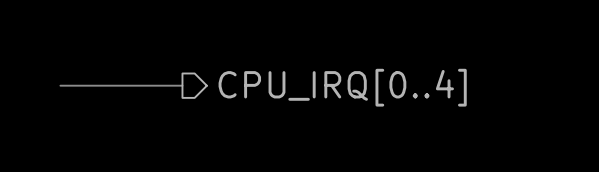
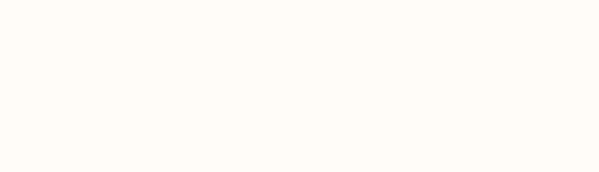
bus: (60, 85) (182, 85) -> none
hierarchical label: CPU_IRQ[0..4] (342, 87) -> none

